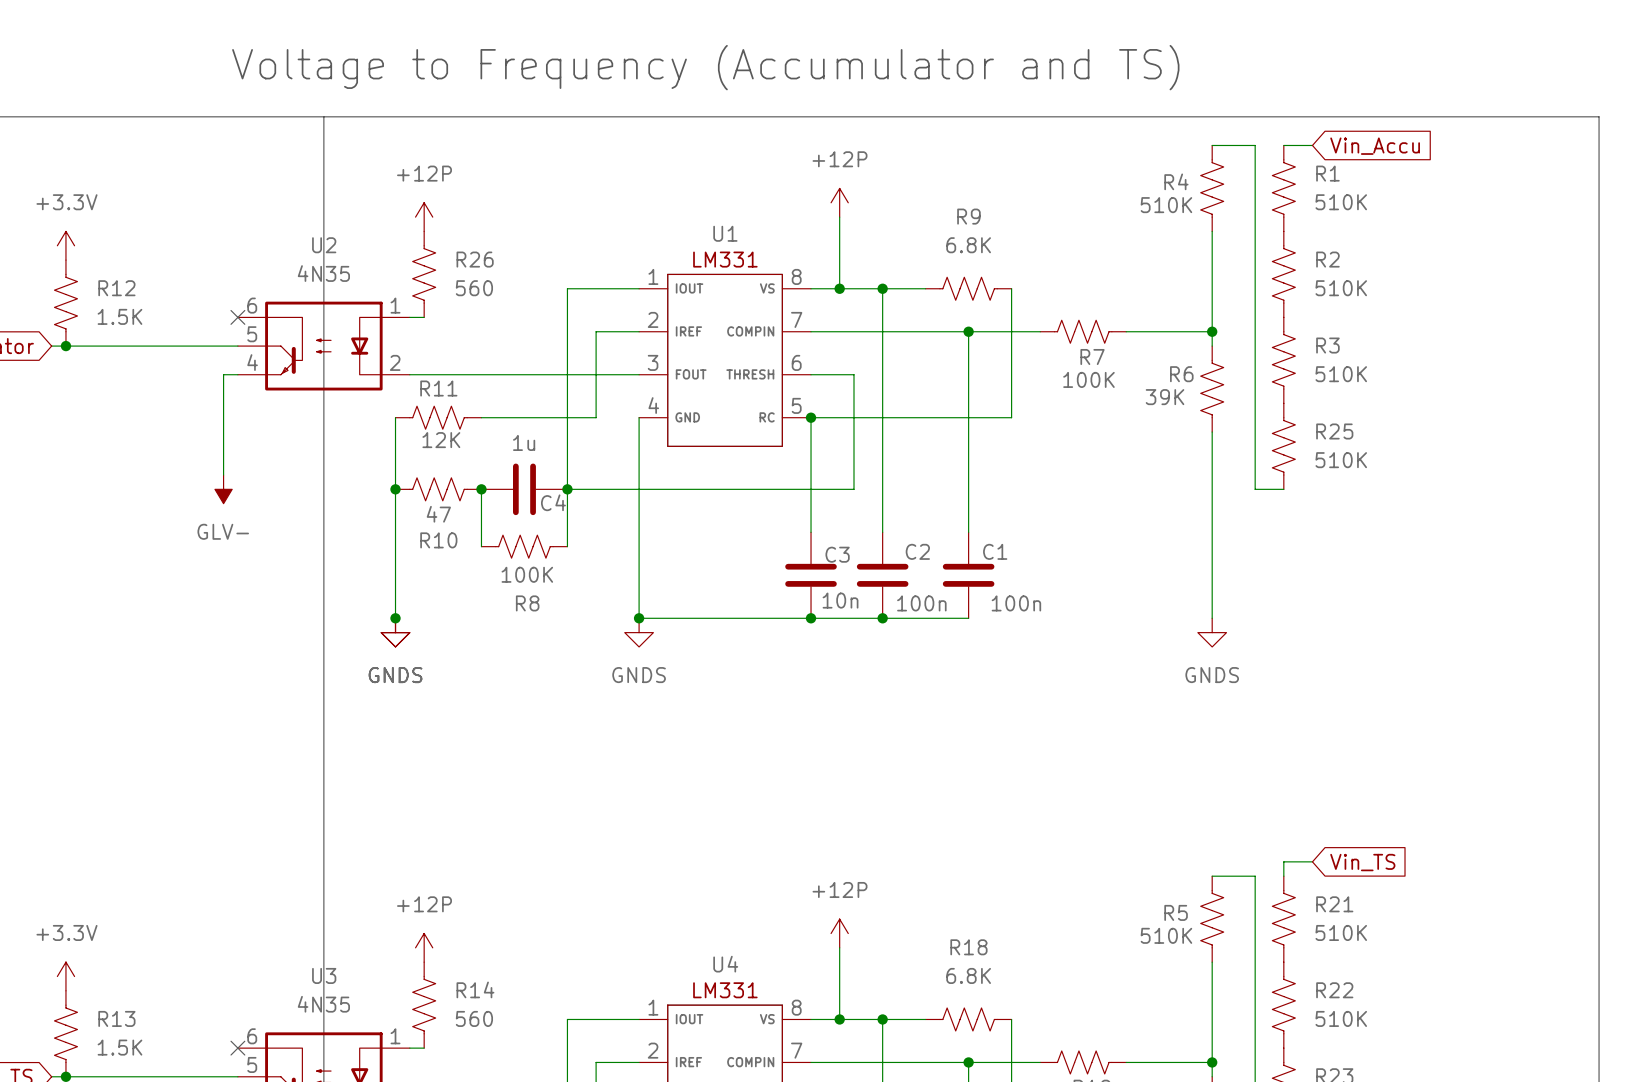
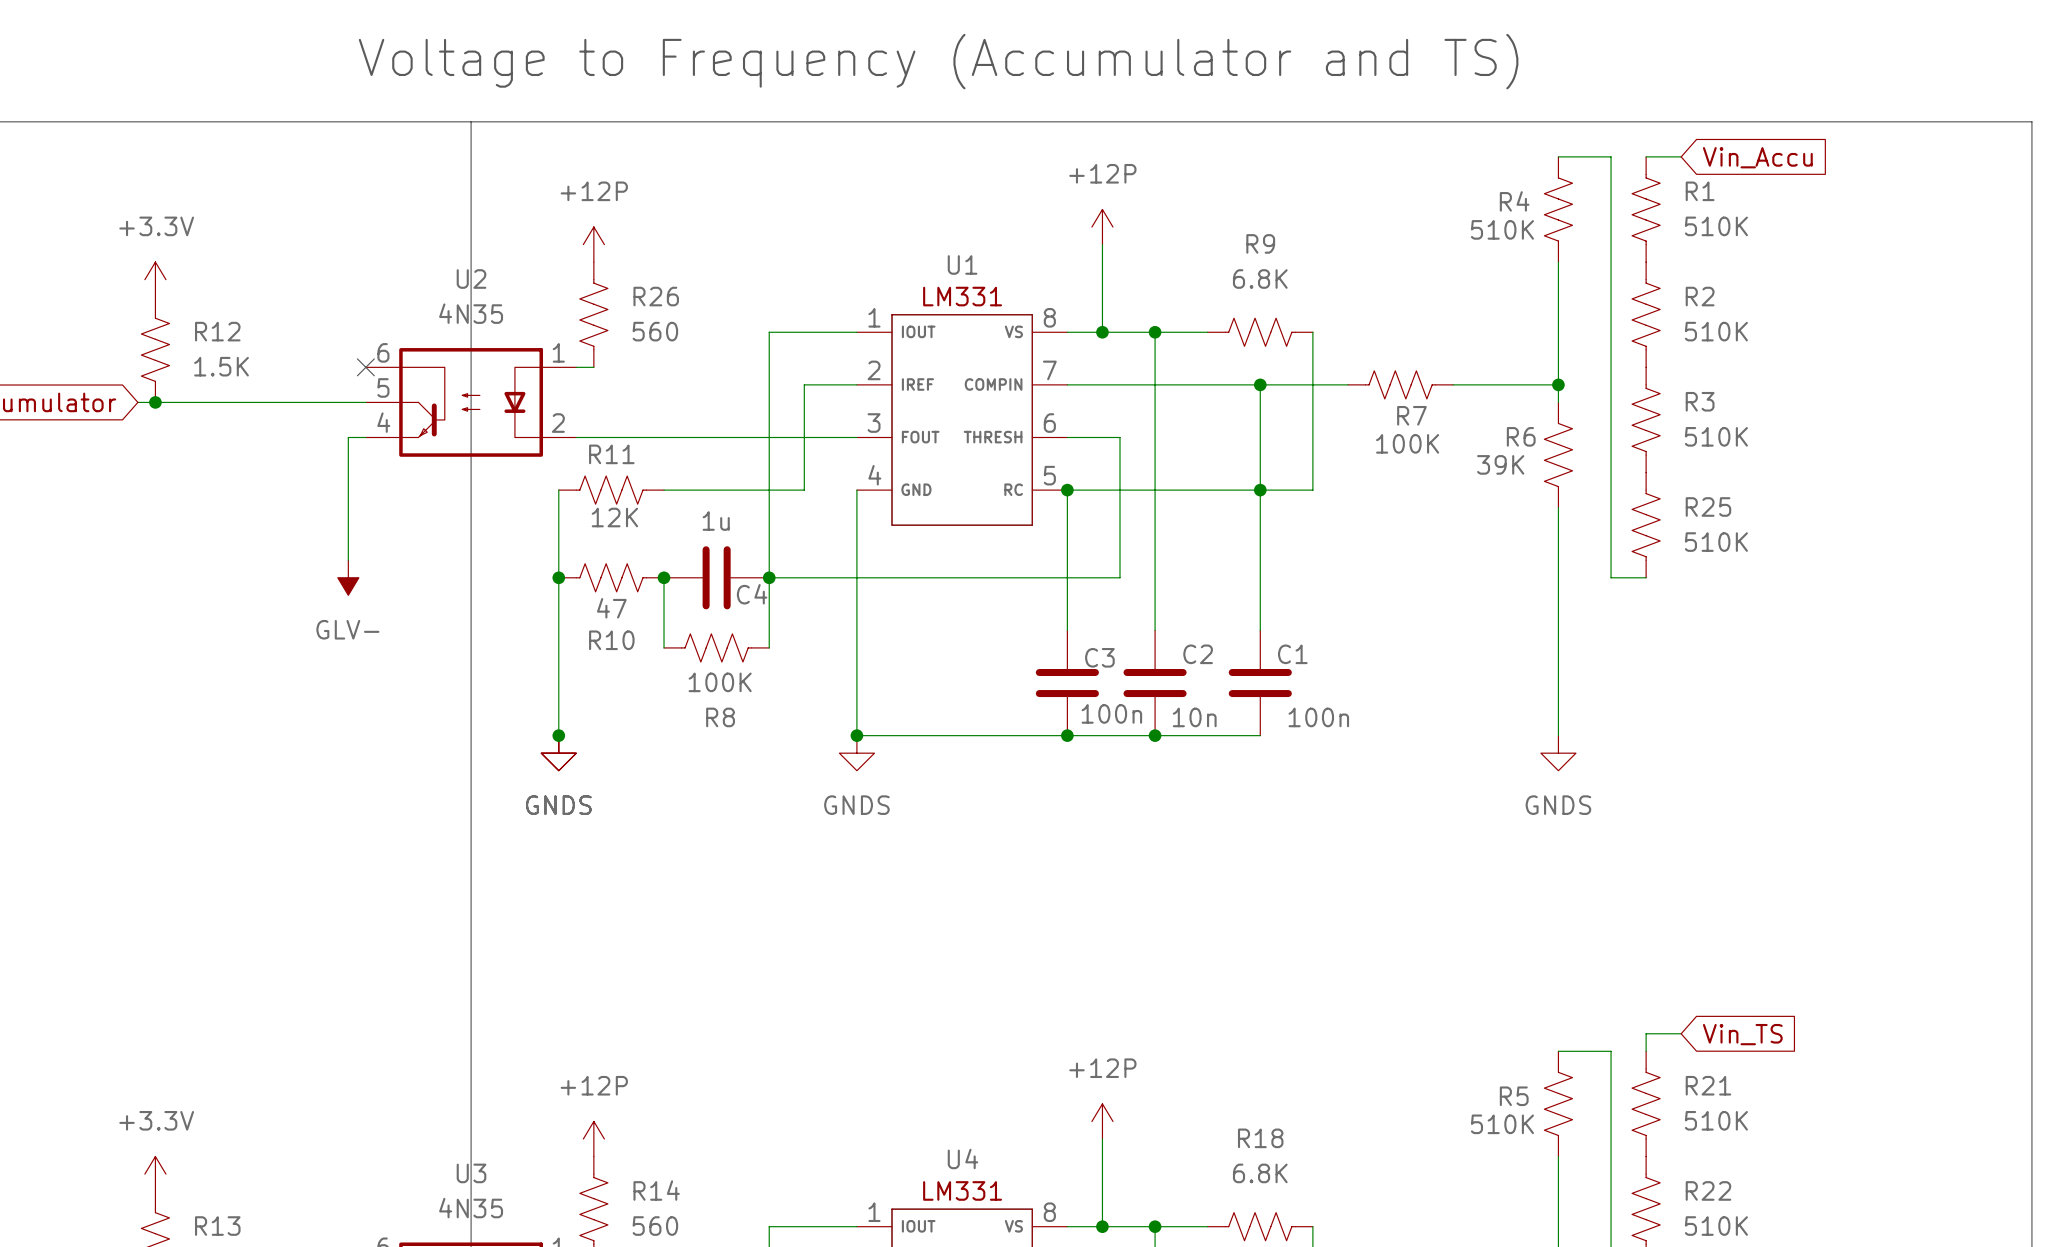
junction: none -> (1260, 490)
C3 value: 10n (840, 600) -> 100n (1111, 713)
C2 value: 100n (921, 603) -> 10n (1194, 717)

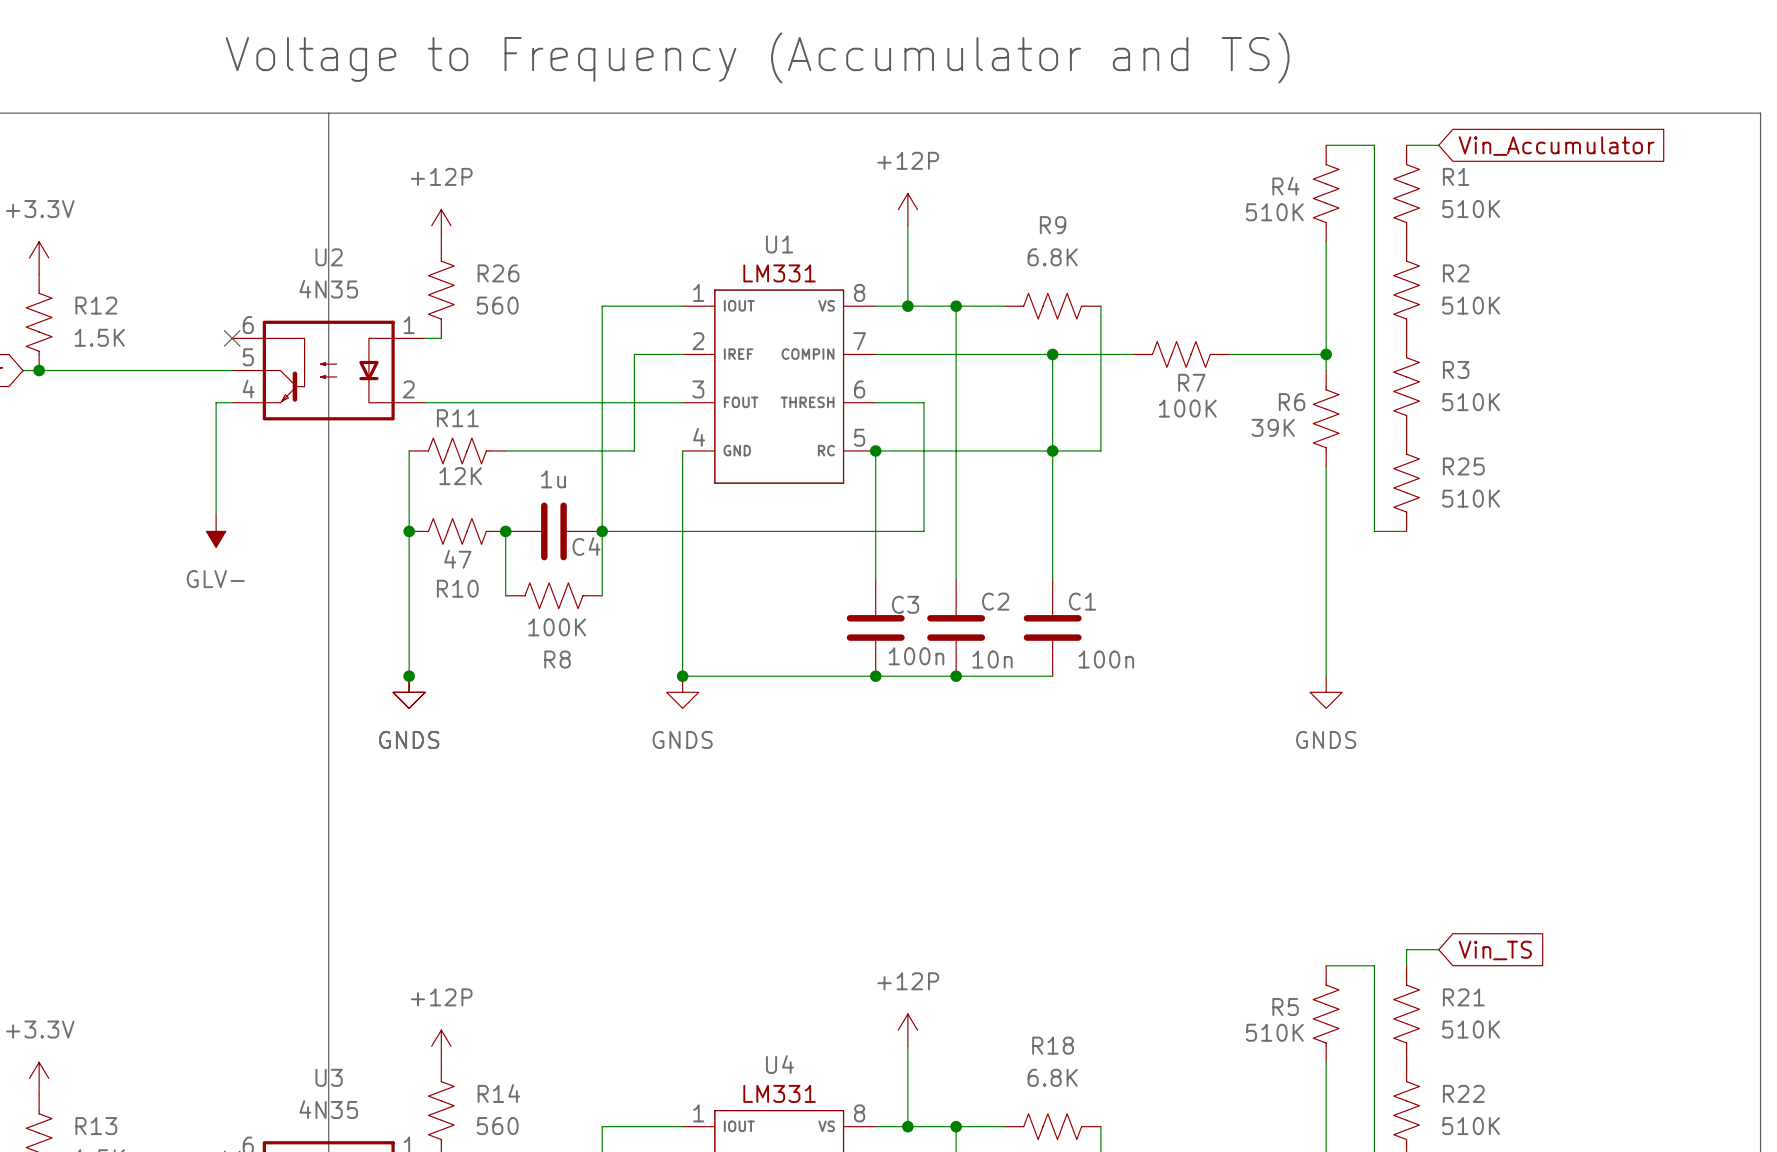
global label: Vin_Accu (1757, 157) -> Vin_Accumulator (1556, 146)

